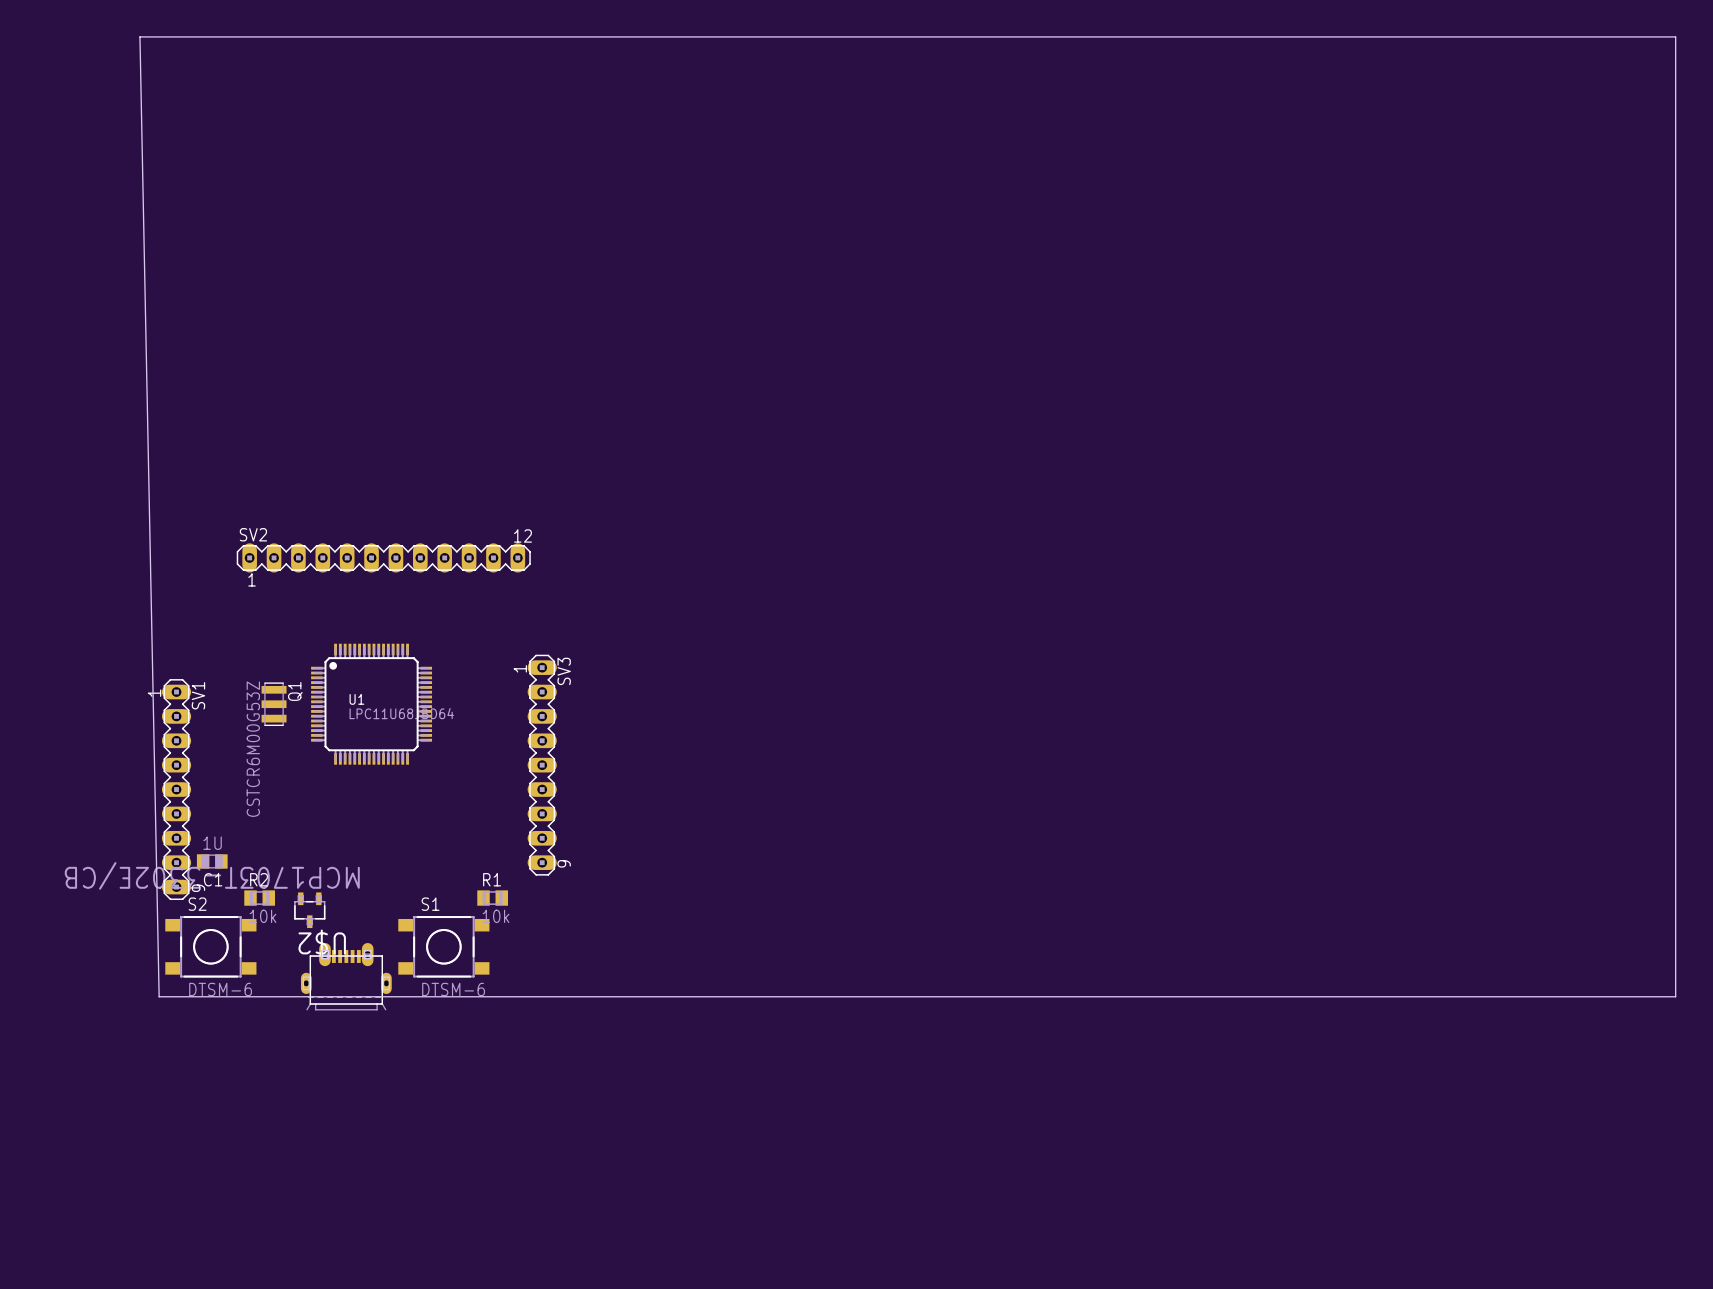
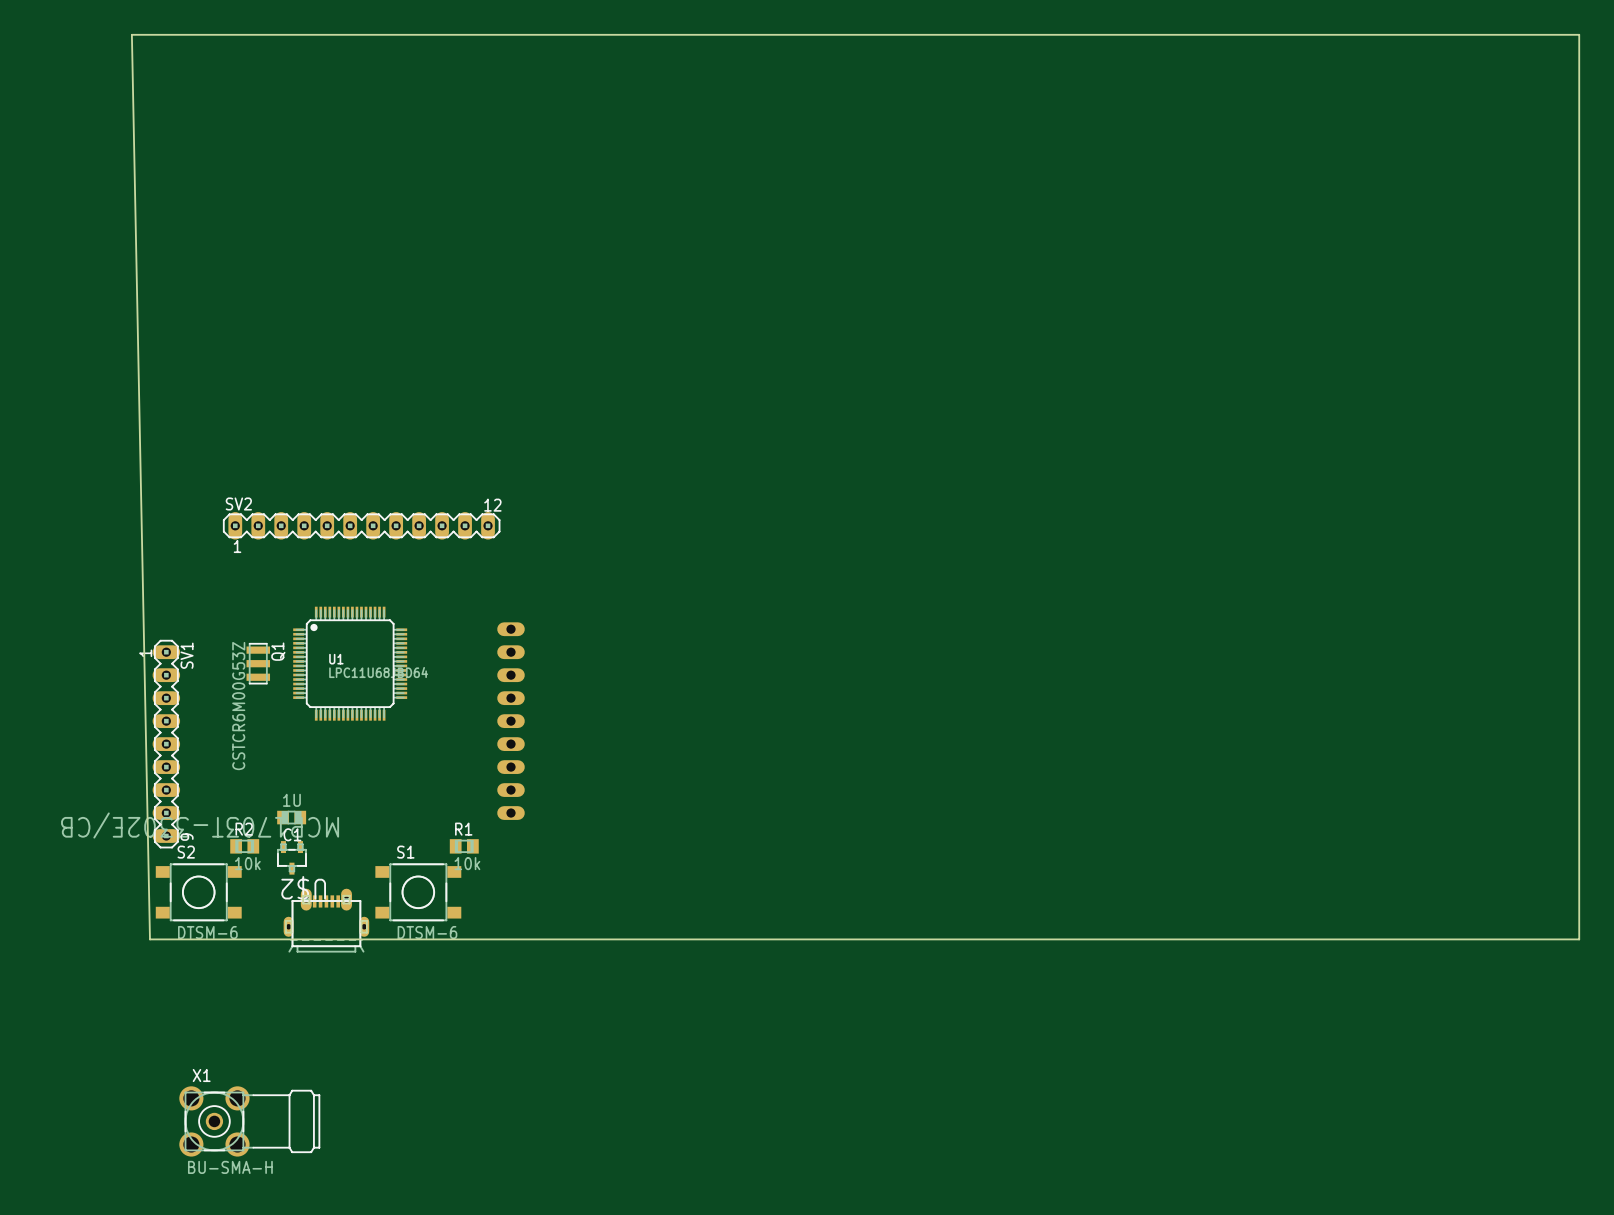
SV3 side: top (542, 765) -> bottom (511, 721)
C1 position: (212, 861) -> (291, 817)
X1: none -> BU-SMA-H (249, 1121)

